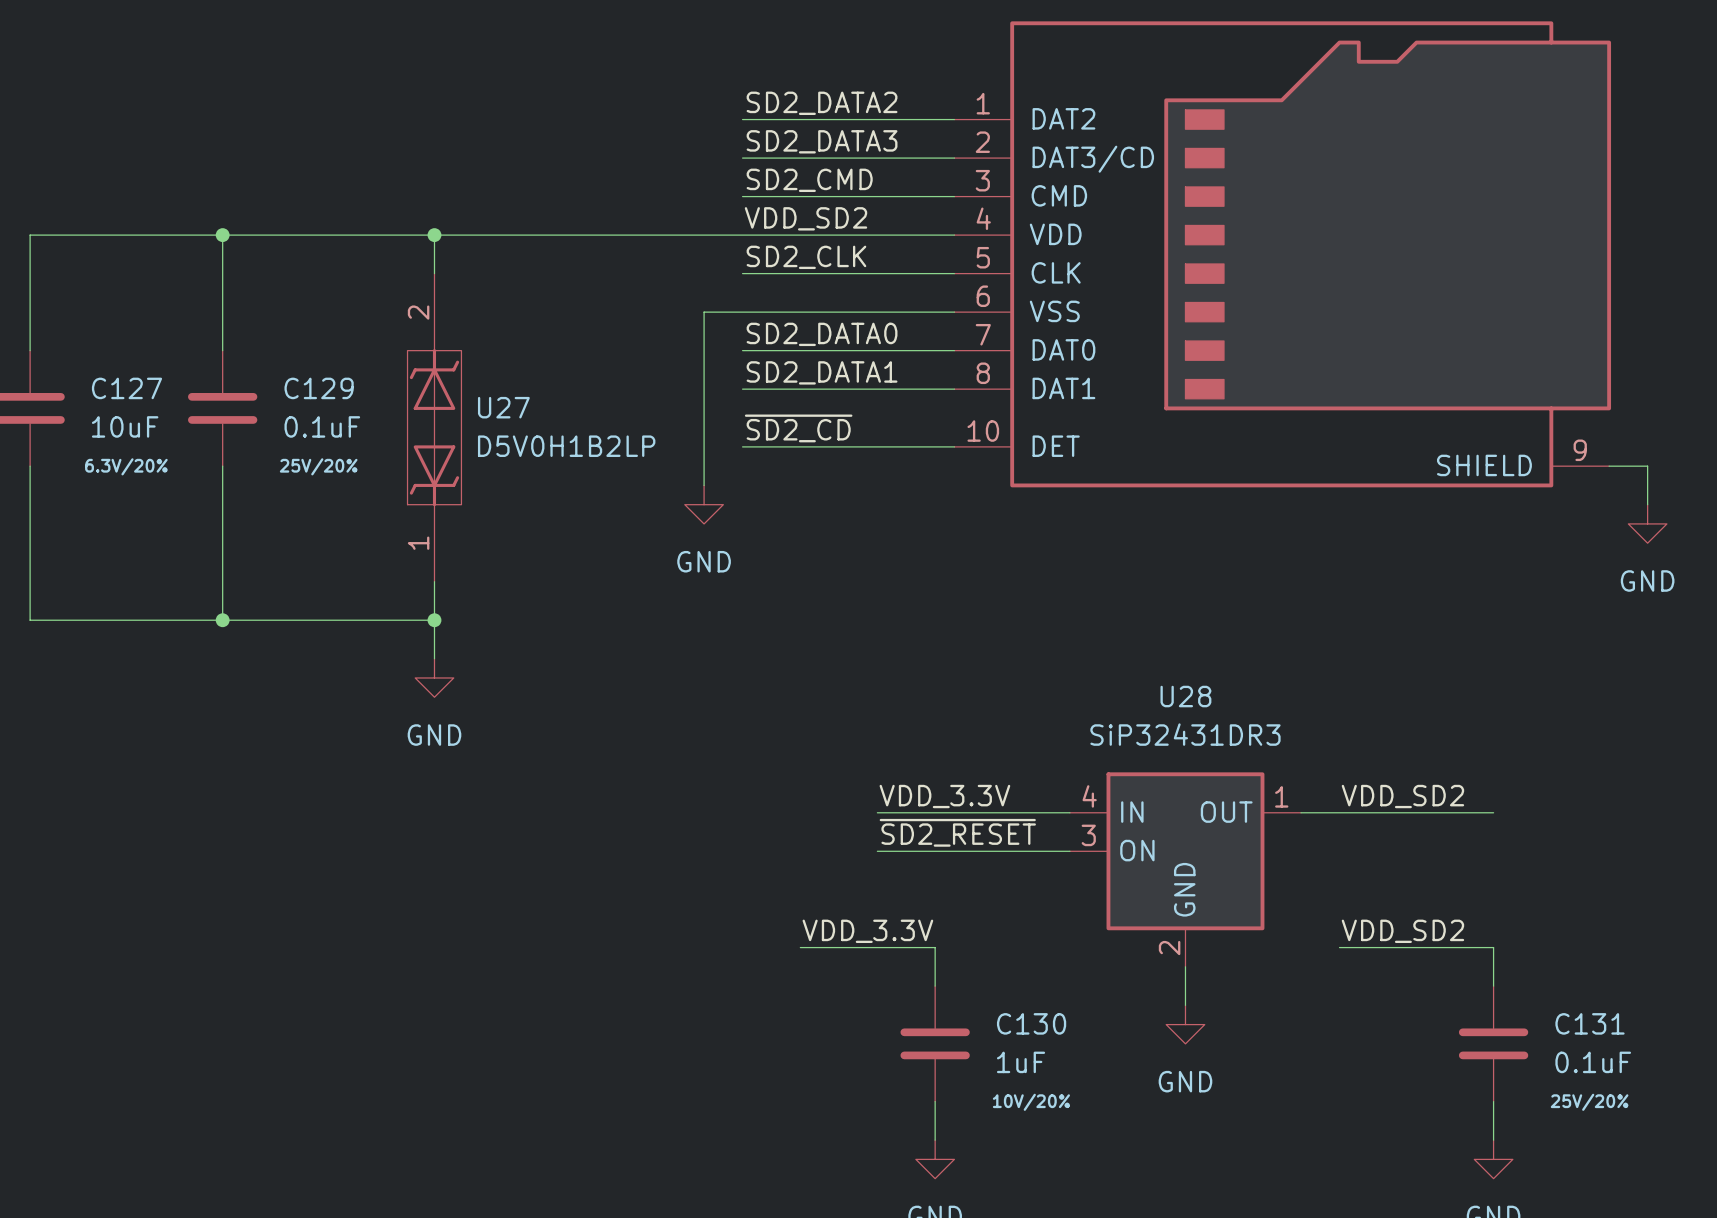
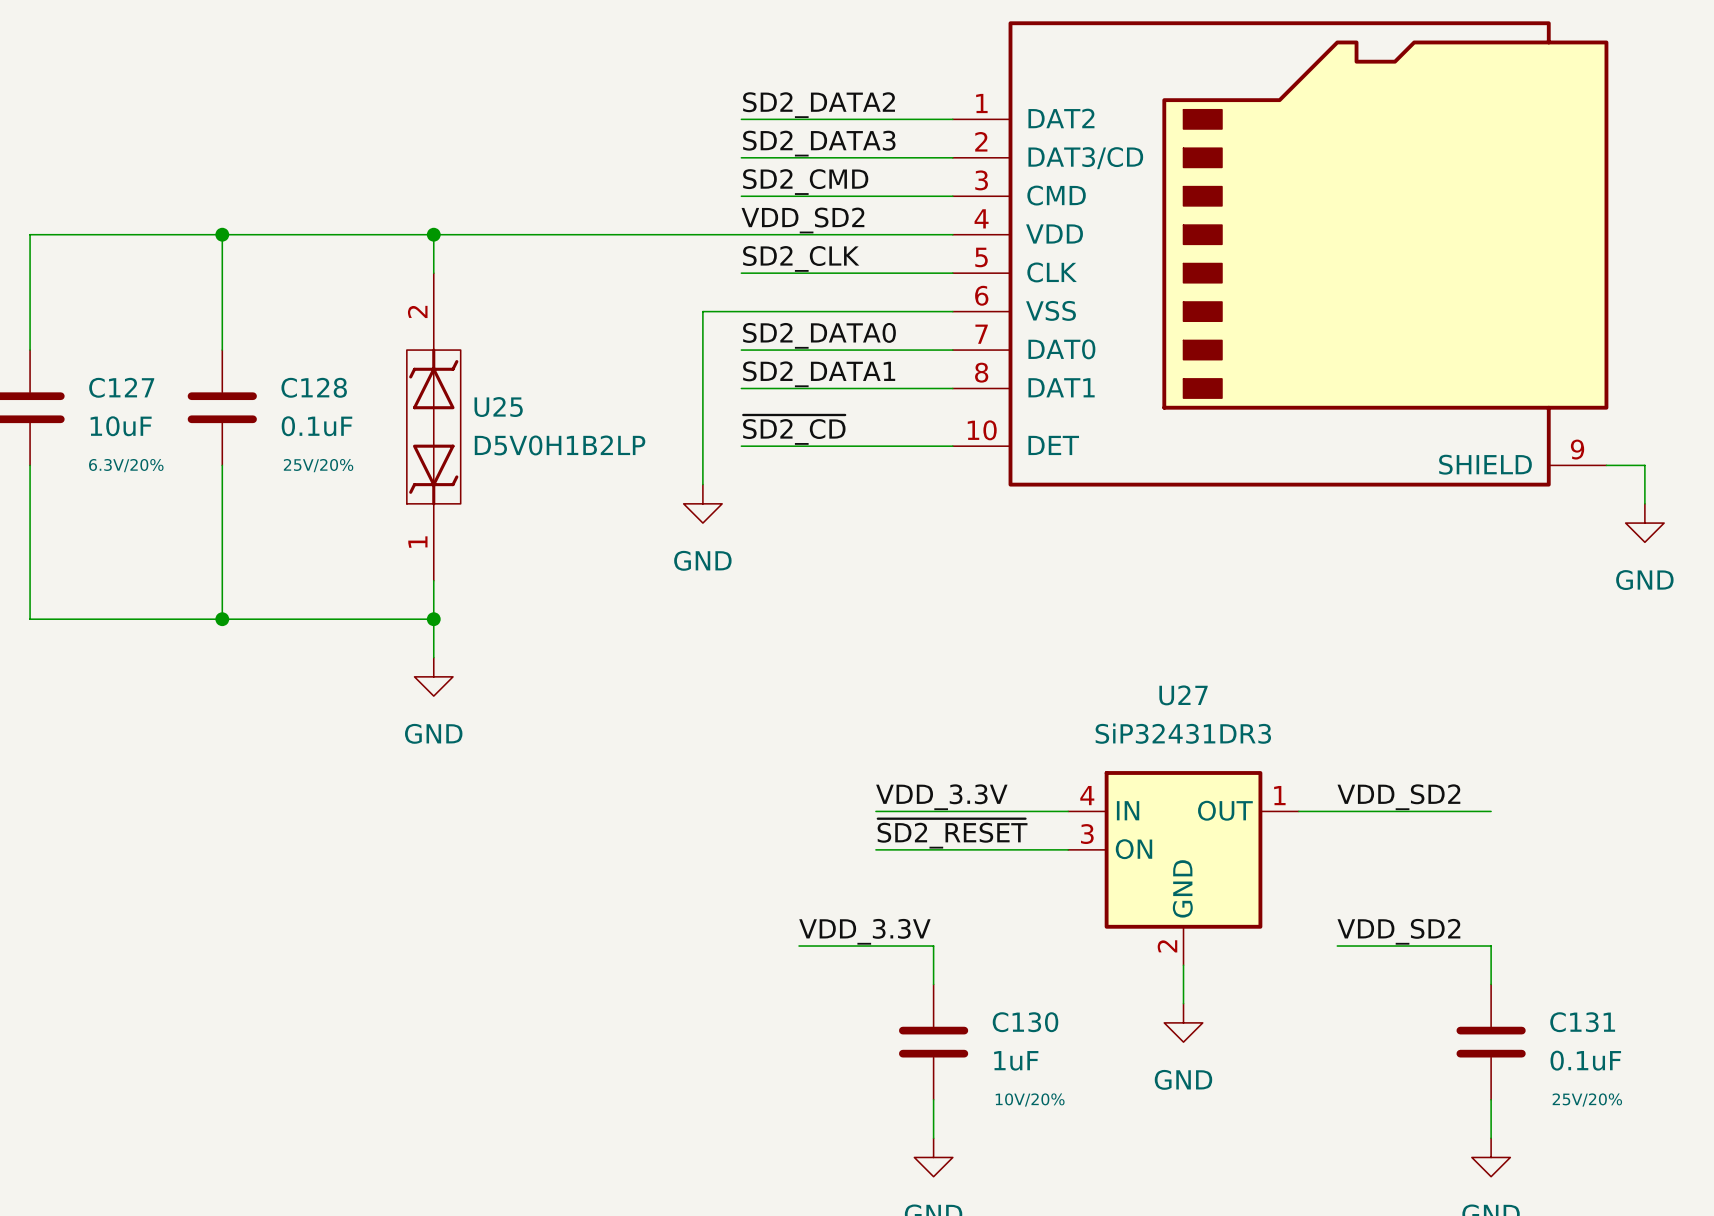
C129 name: C129 (319, 388) -> C128 (314, 387)
U27 name: U27 (503, 407) -> U25 (498, 407)
U28 name: U28 (1185, 696) -> U27 (1183, 695)

